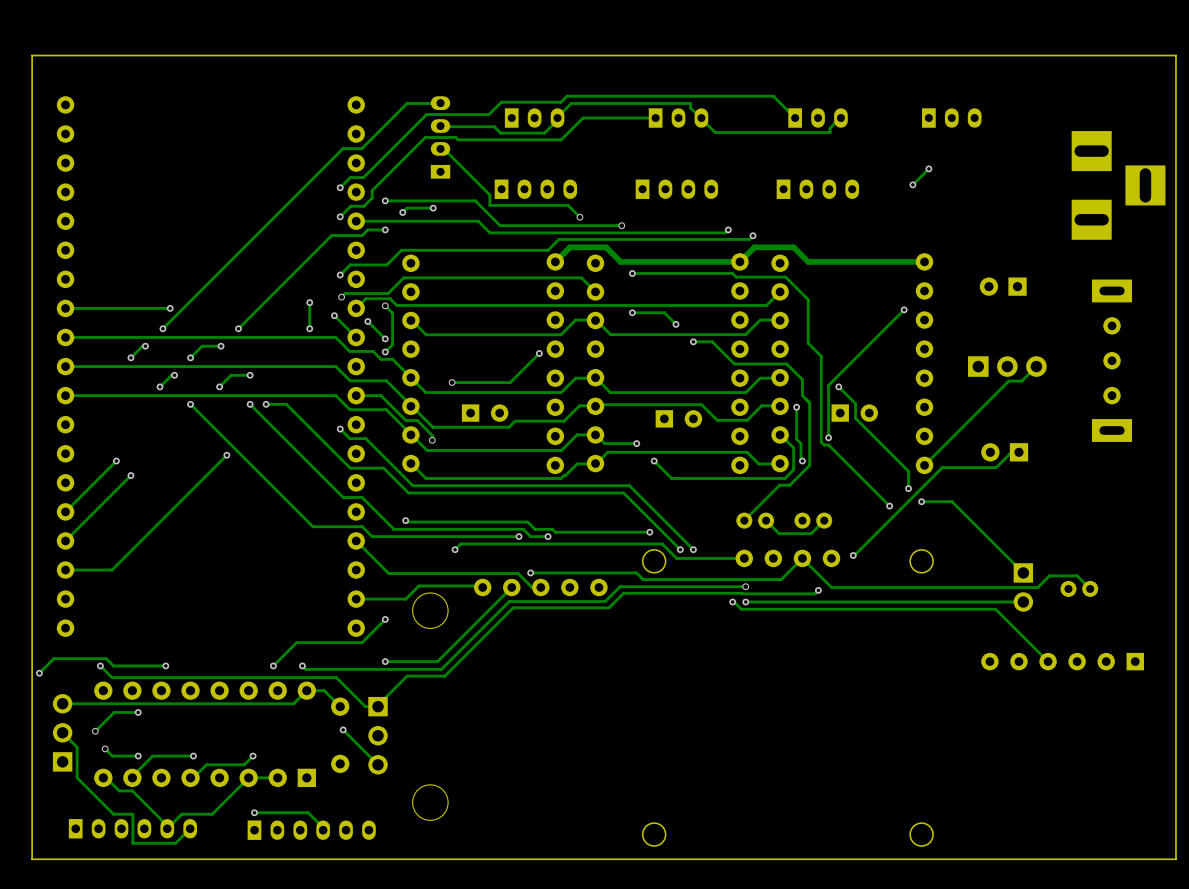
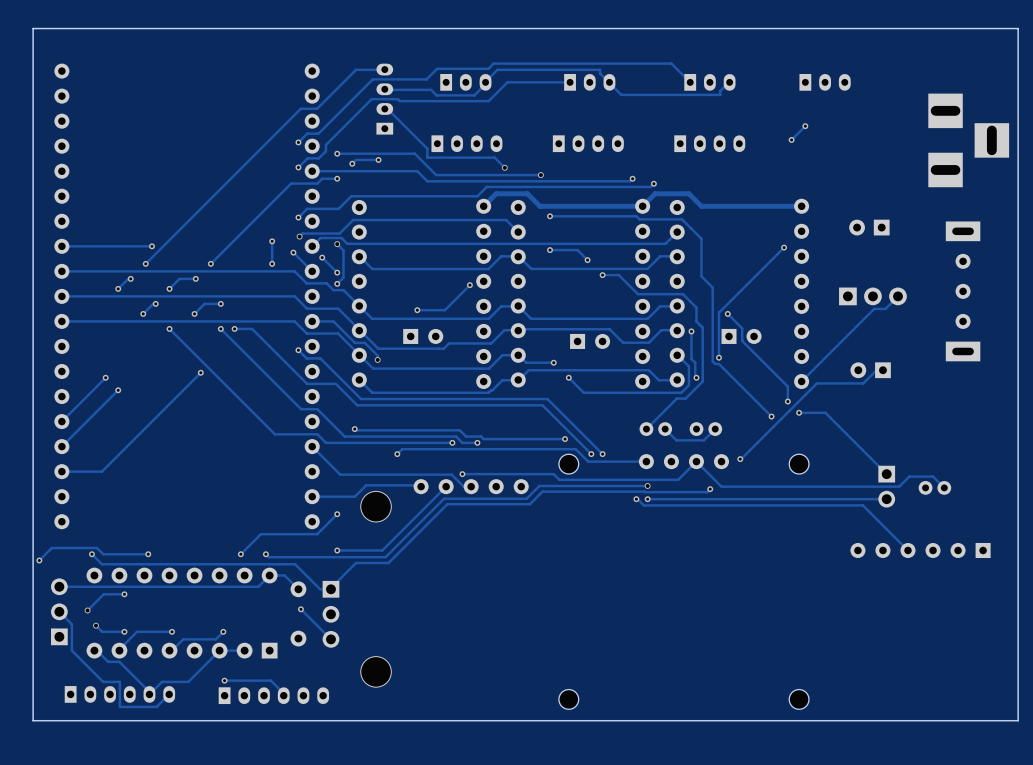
via: (452, 382) -> none
track: (478, 382) (452, 382) -> none
via: none -> (417, 310)

